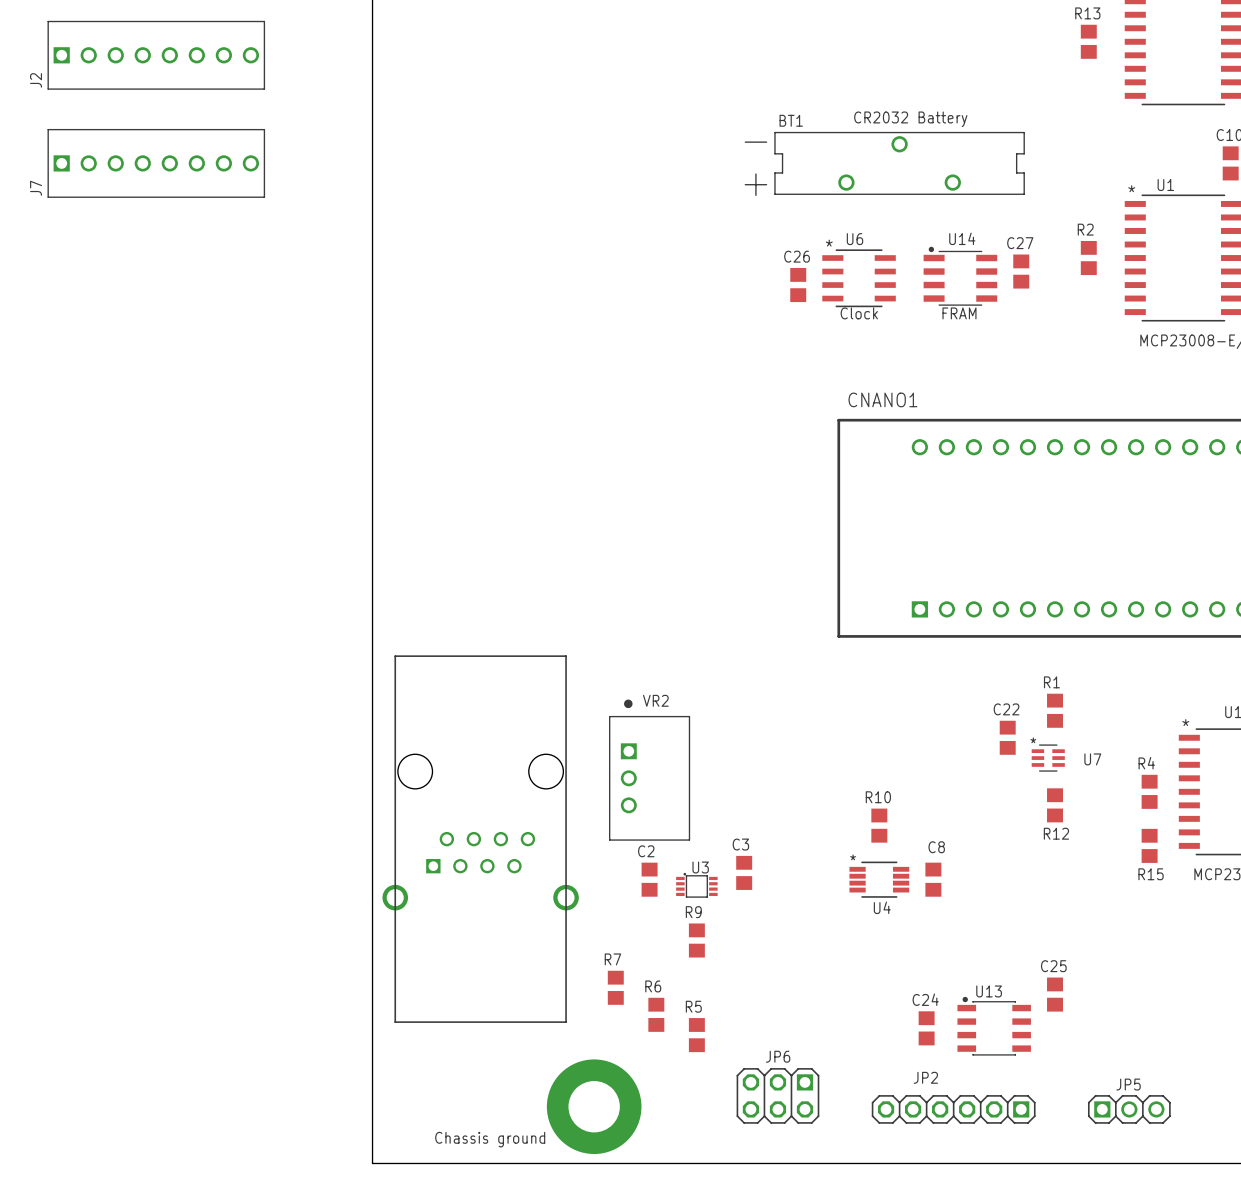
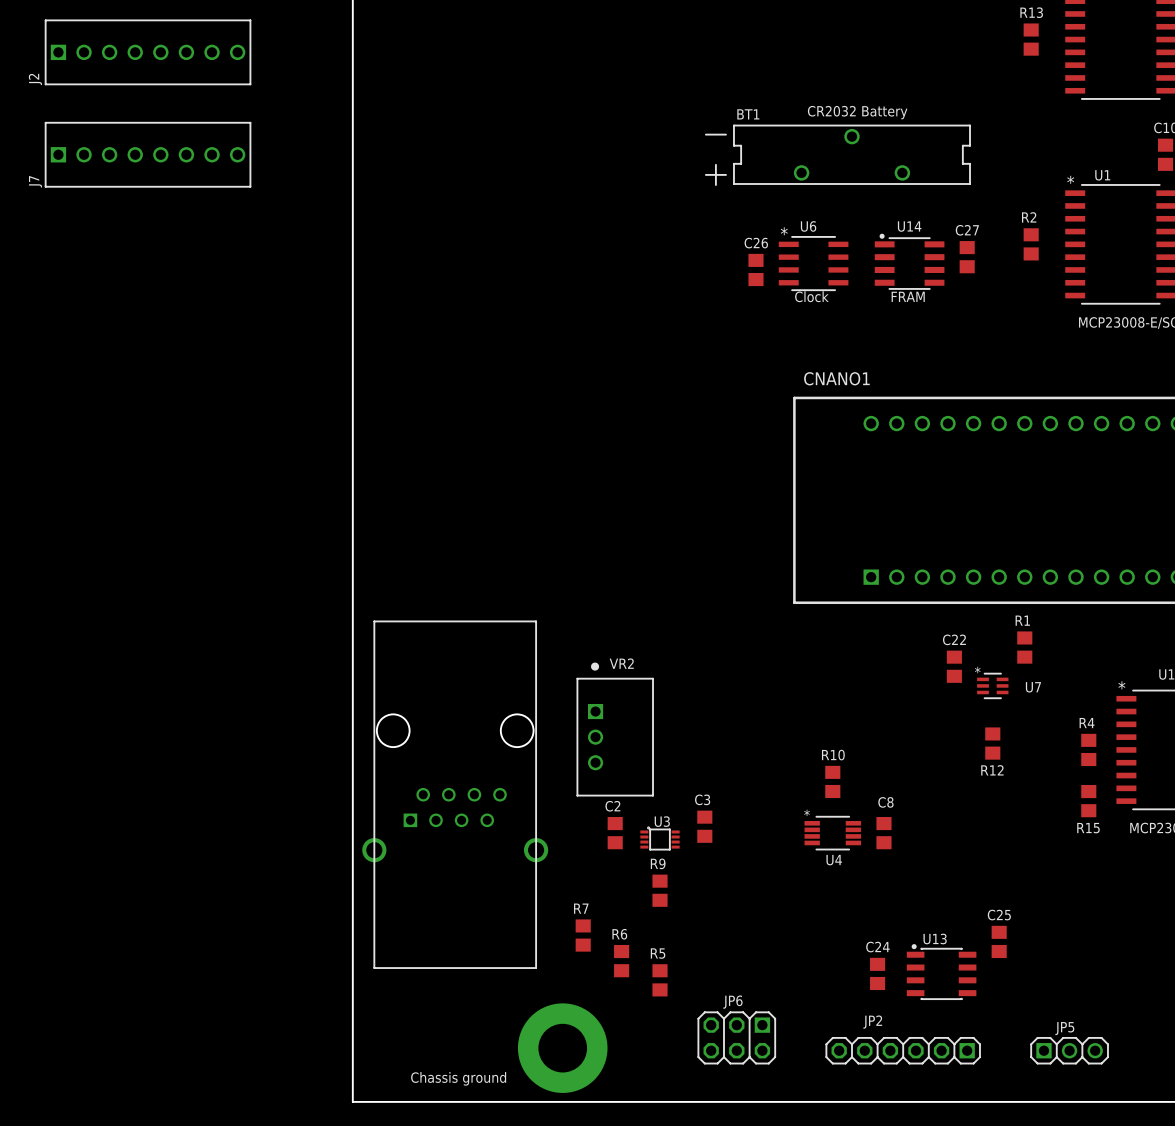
R1 position: (1055, 710) -> (1024, 647)
C22 position: (1007, 737) -> (954, 666)
U7 position: (1048, 758) -> (992, 685)
R12 position: (1055, 805) -> (992, 743)

